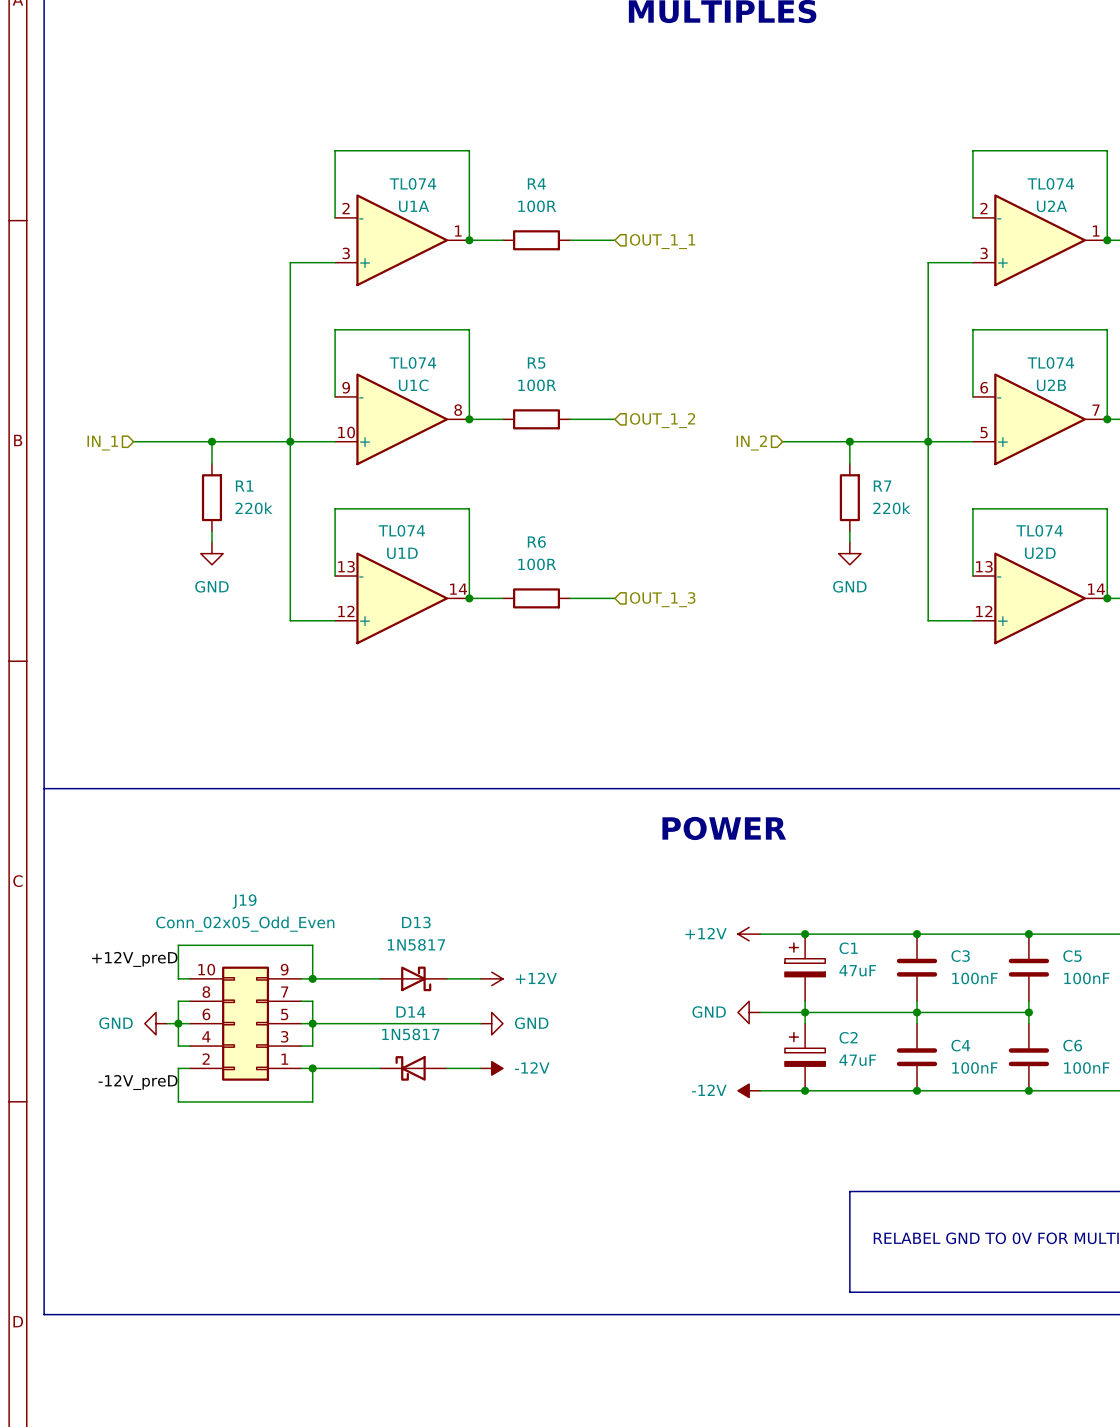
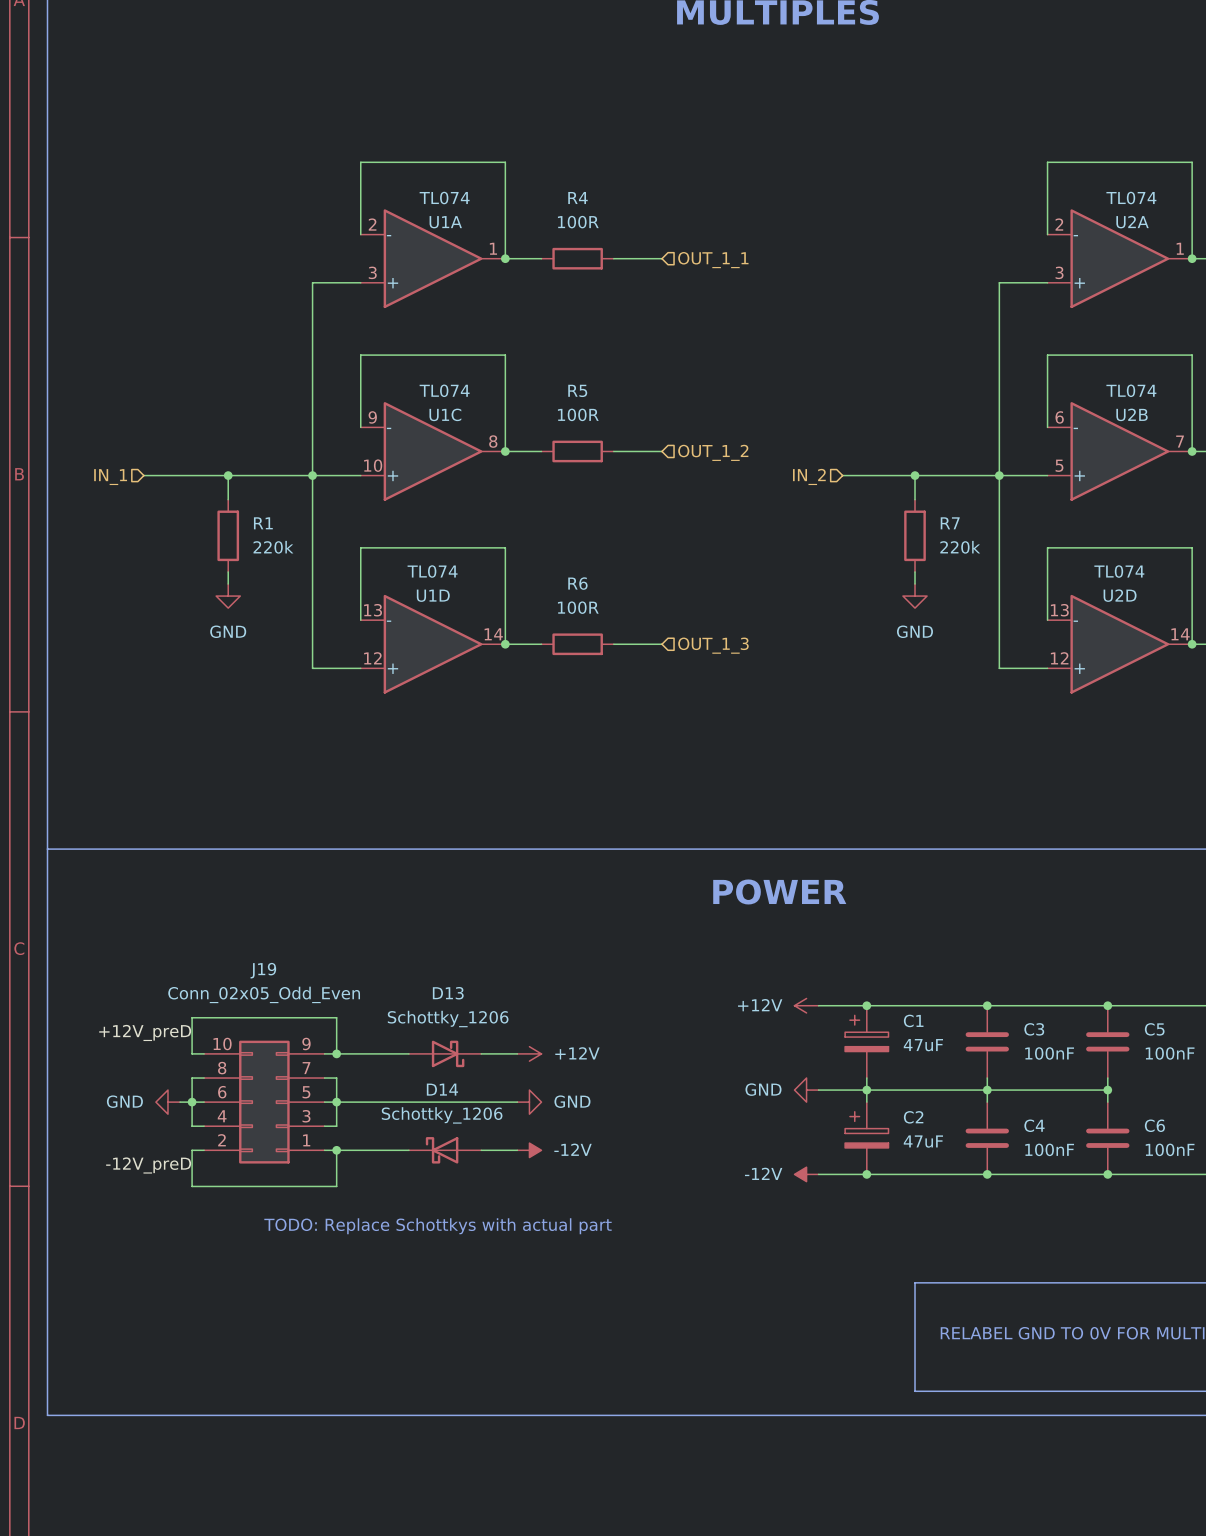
D13 value: 1N5817 (416, 944) -> Schottky_1206 (448, 1019)
D14 value: 1N5817 (410, 1034) -> Schottky_1206 (442, 1115)
text: none -> TODO: Replace Schottkys with actual part (438, 1226)

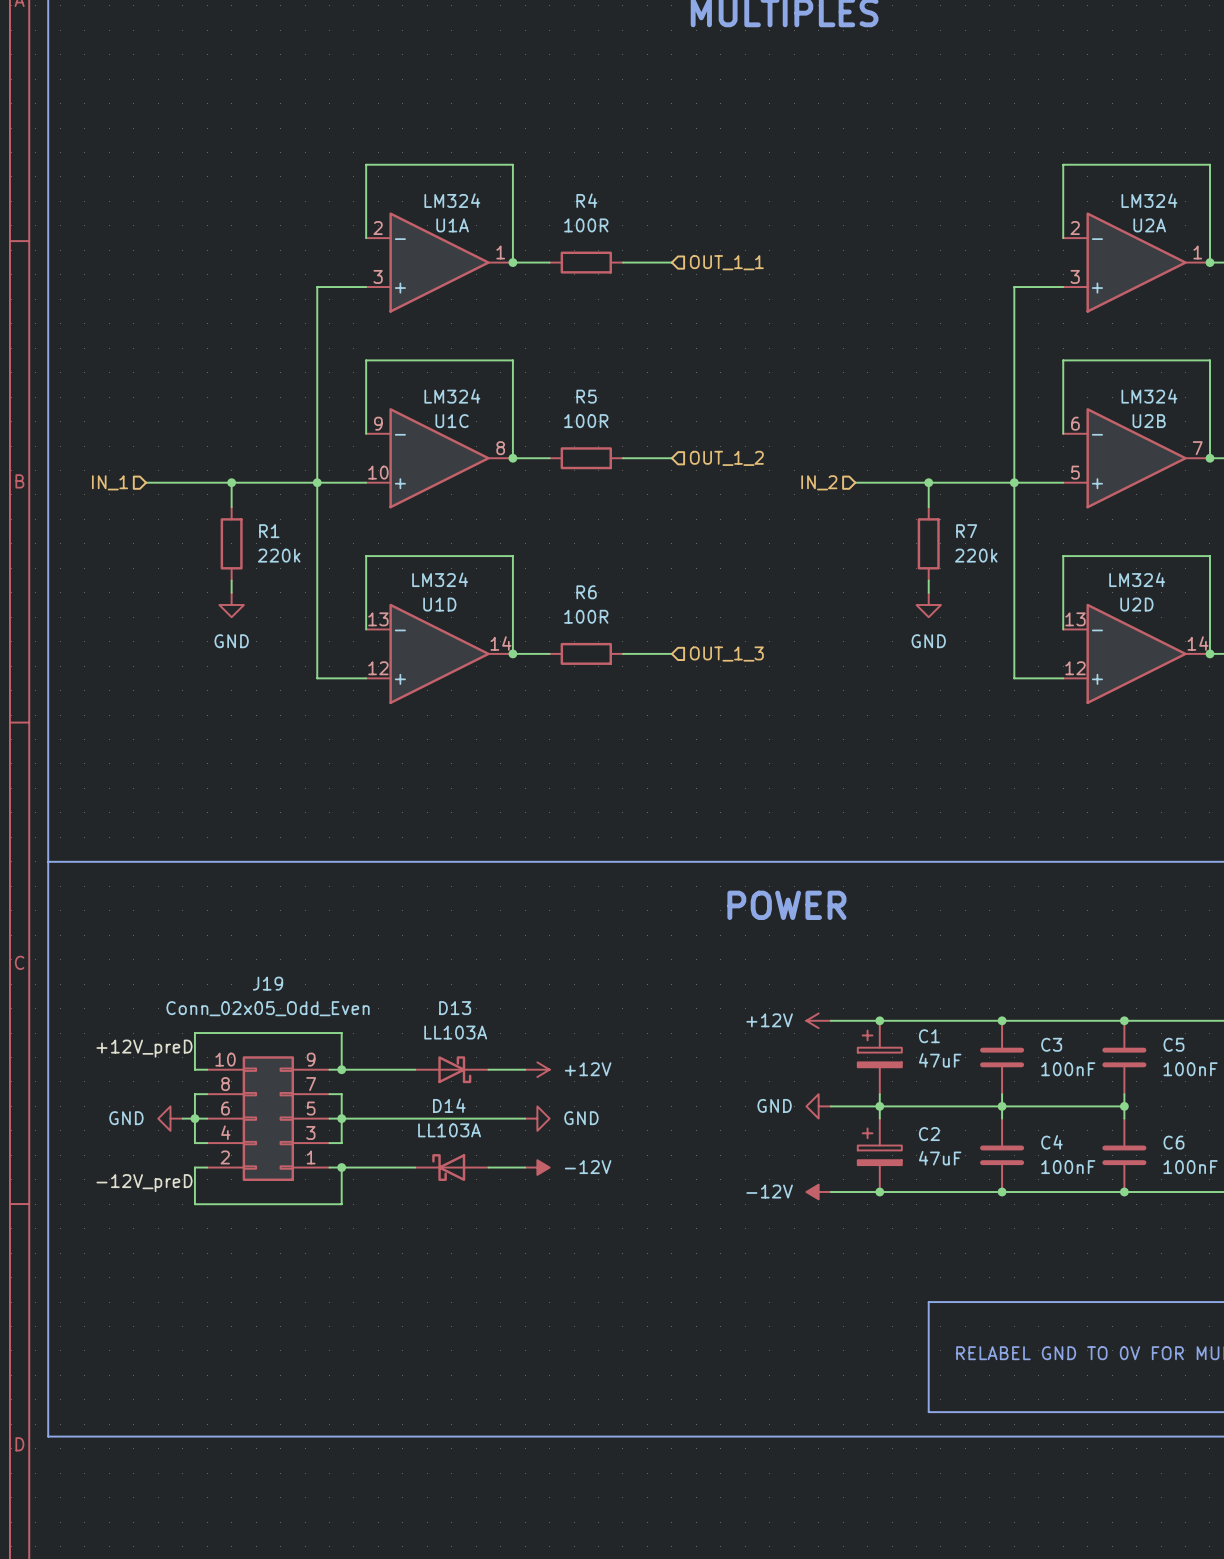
U1A value: TL074 (444, 198) -> LM324 (452, 200)
U2A value: TL074 (1131, 198) -> LM324 (1149, 200)
U1C value: TL074 (444, 390) -> LM324 (452, 396)
U2B value: TL074 (1131, 390) -> LM324 (1149, 396)
U1D value: TL074 (432, 571) -> LM324 (440, 579)
U2D value: TL074 (1119, 571) -> LM324 (1137, 579)
D13 value: Schottky_1206 (448, 1019) -> LL103A (455, 1032)
D14 value: Schottky_1206 (442, 1115) -> LL103A (449, 1130)
text: TODO: Replace Schottkys with actual part (438, 1226) -> none

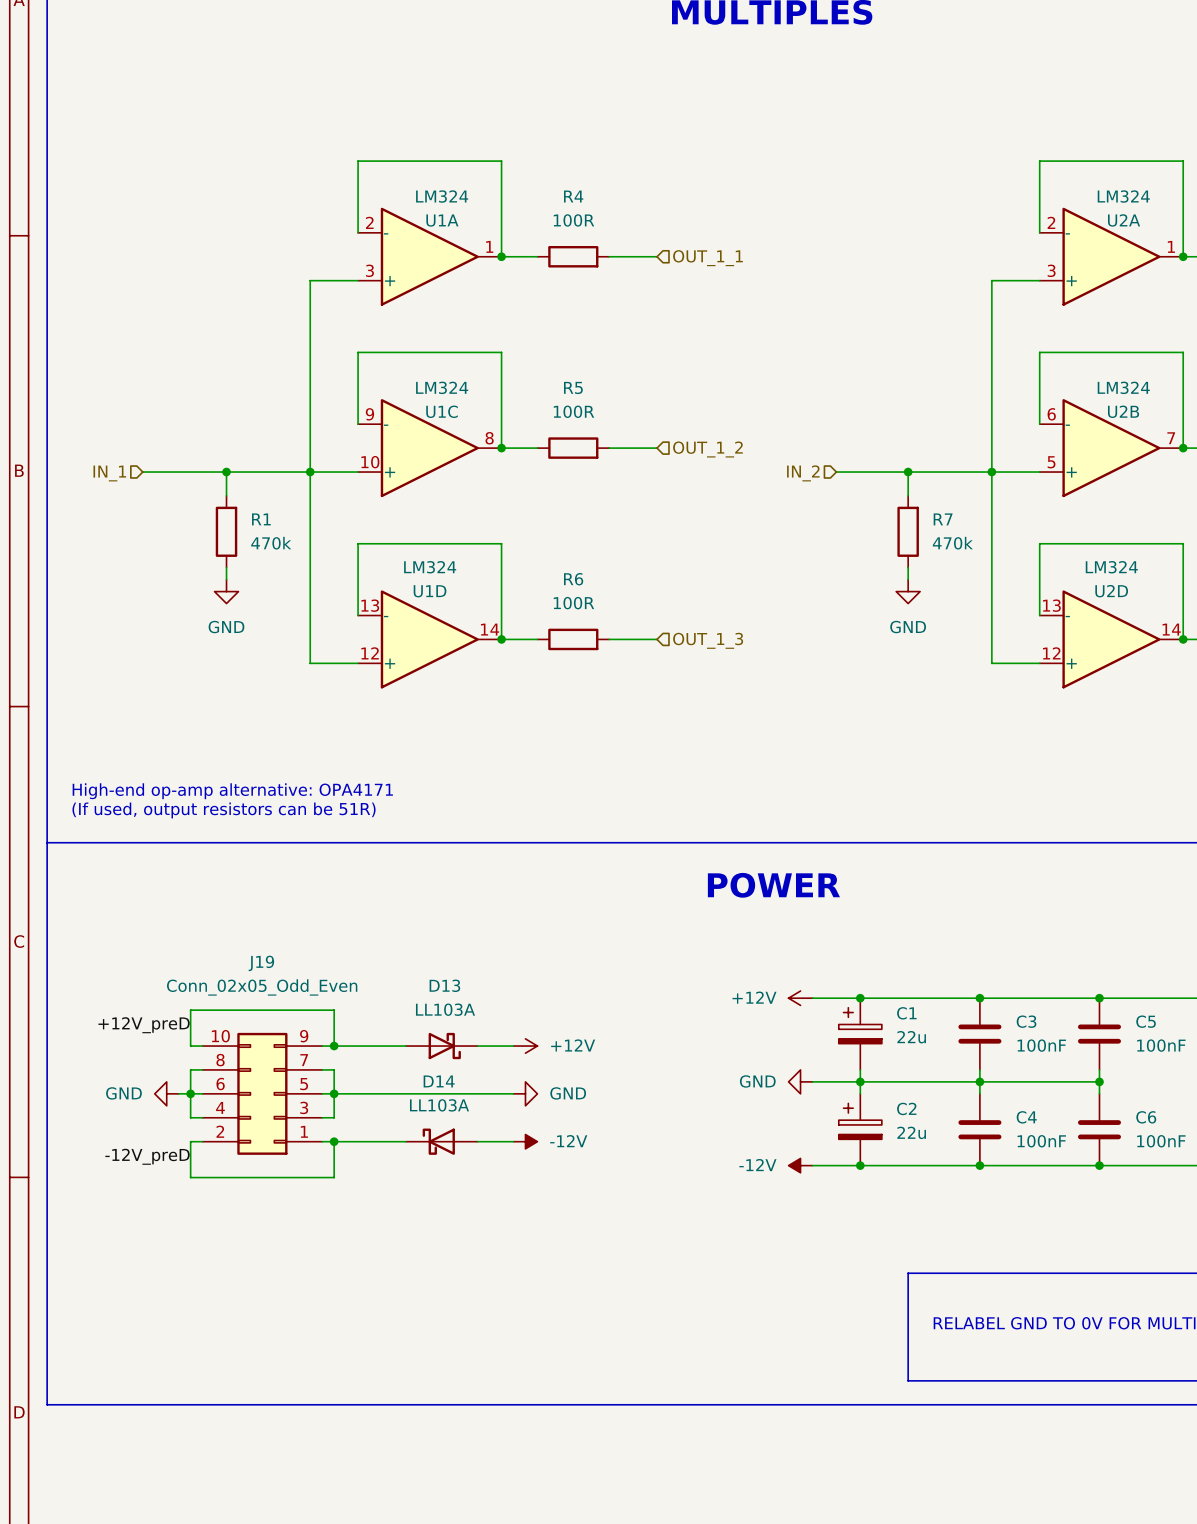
R1 value: 220k (279, 555) -> 470k (271, 543)
R7 value: 220k (976, 555) -> 470k (952, 543)
text: none -> High-end op-amp alternative: OPA4171 (232, 791)
text: none -> (If used, output resistors can be 51R) (224, 810)
C1 value: 47uF (940, 1060) -> 22u (911, 1037)
C2 value: 47uF (940, 1158) -> 22u (911, 1132)

